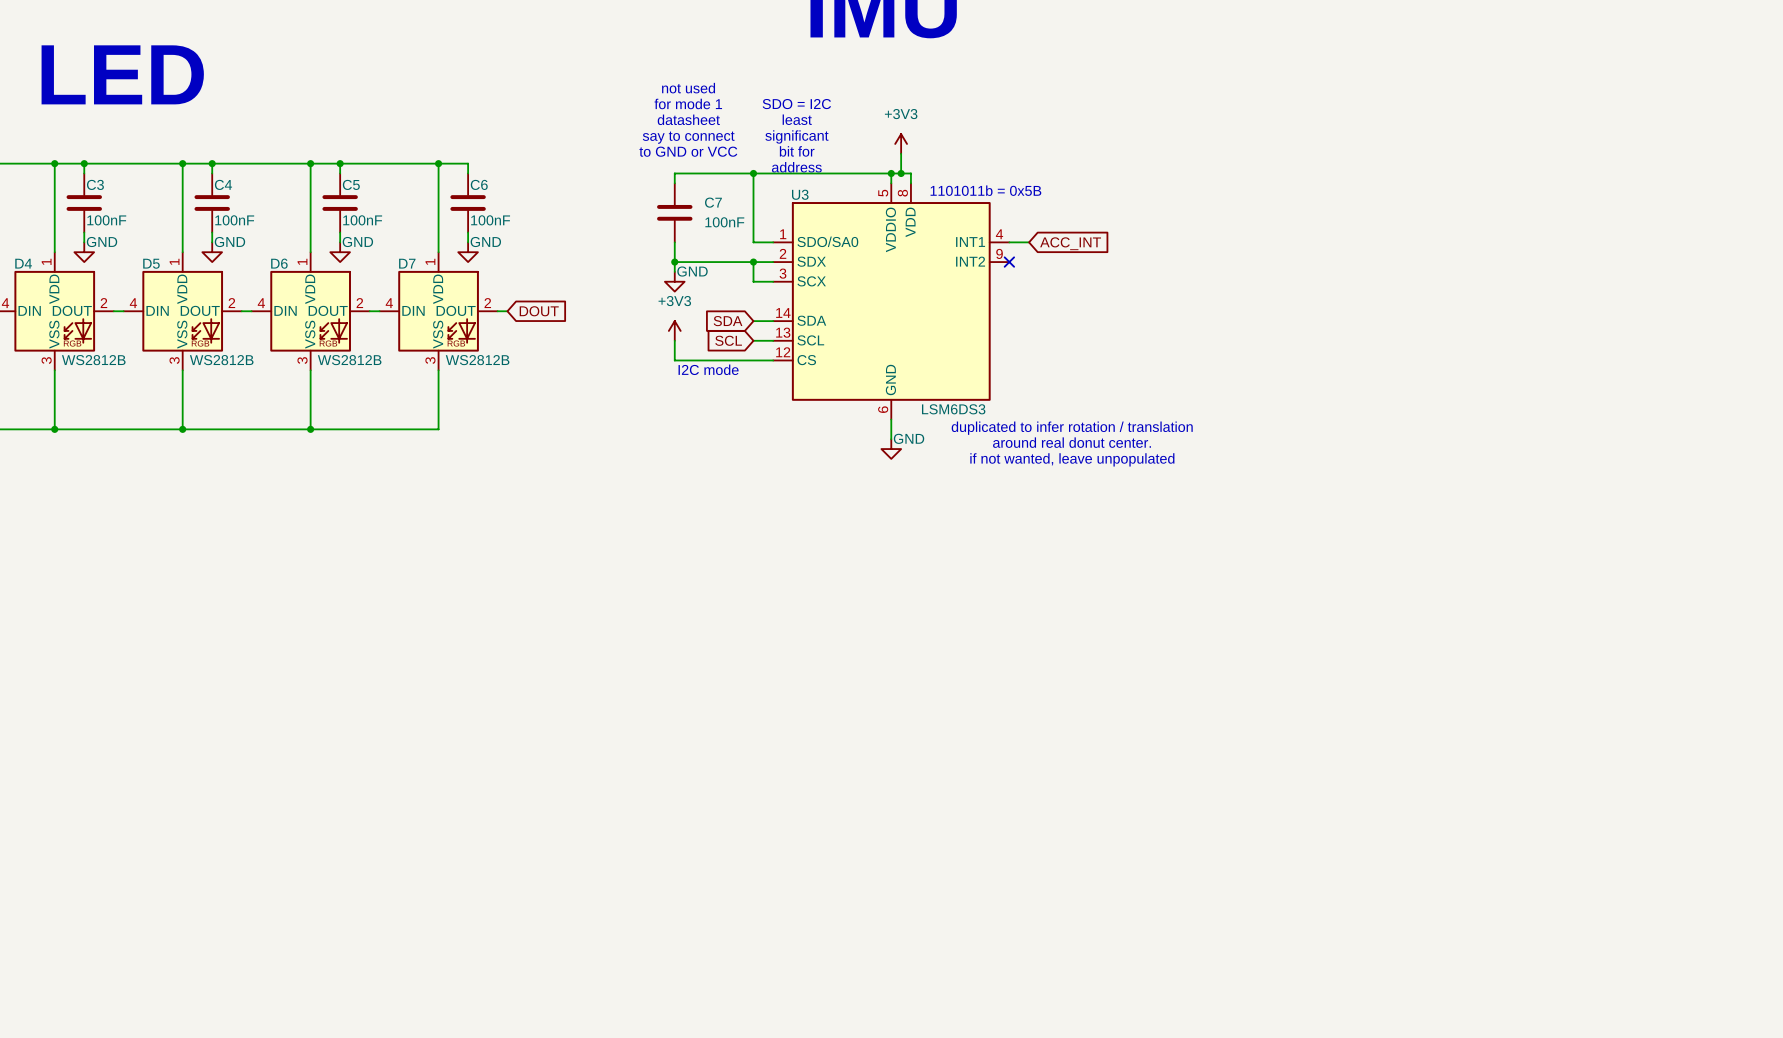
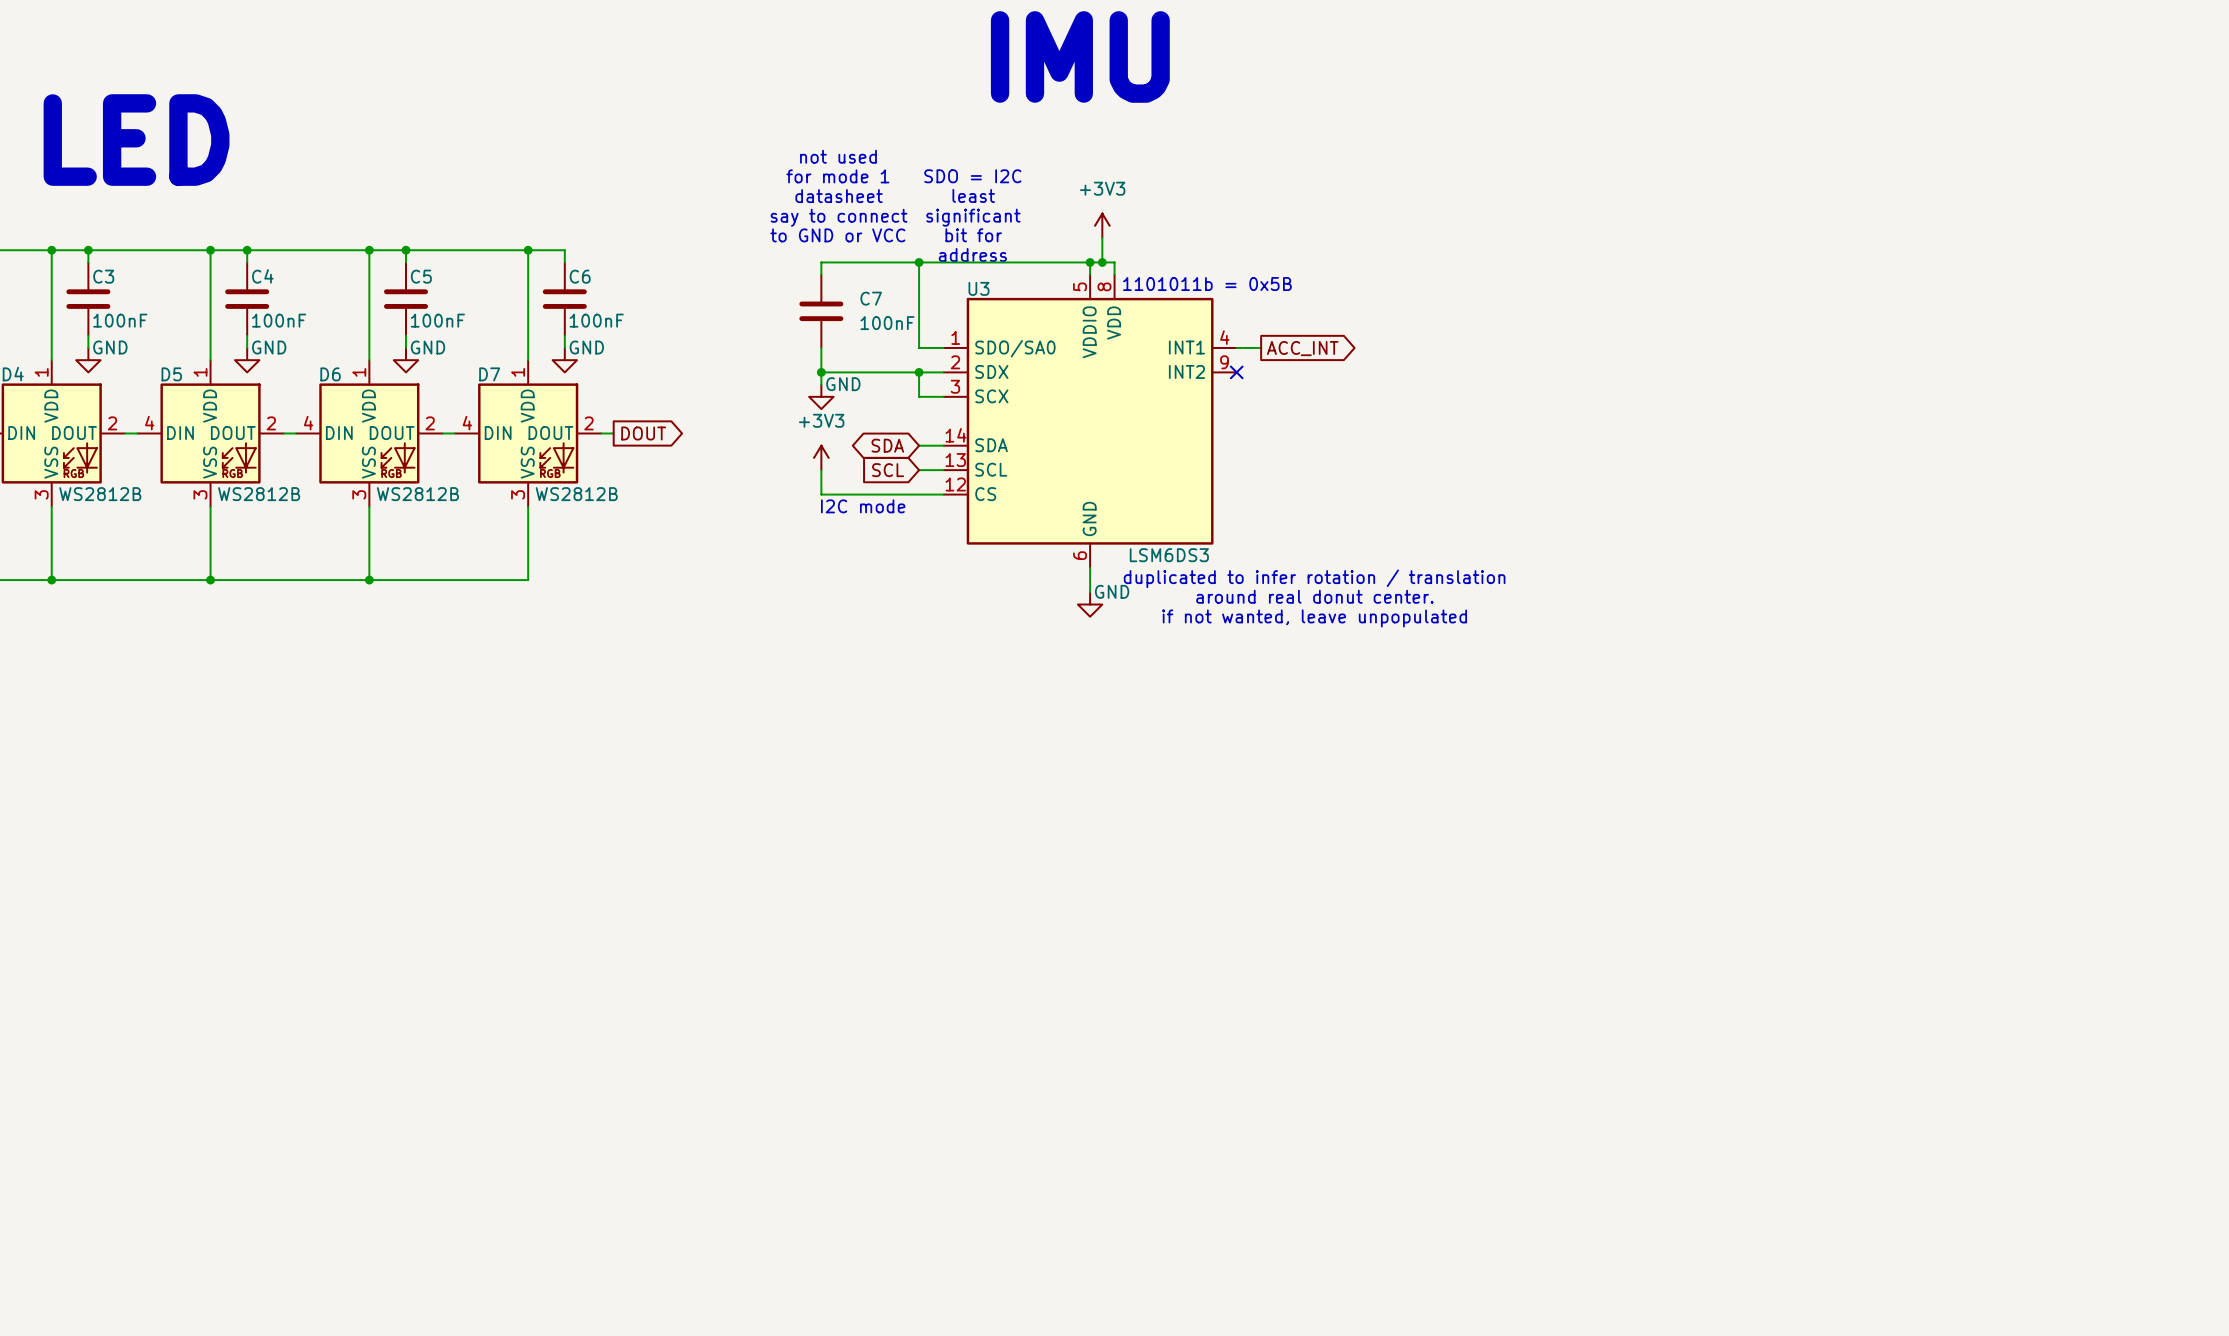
global label shape: input (1070, 243) -> output (1302, 348)
global label shape: input (539, 311) -> output (643, 433)
global label shape: input (728, 321) -> bidirectional (887, 445)

